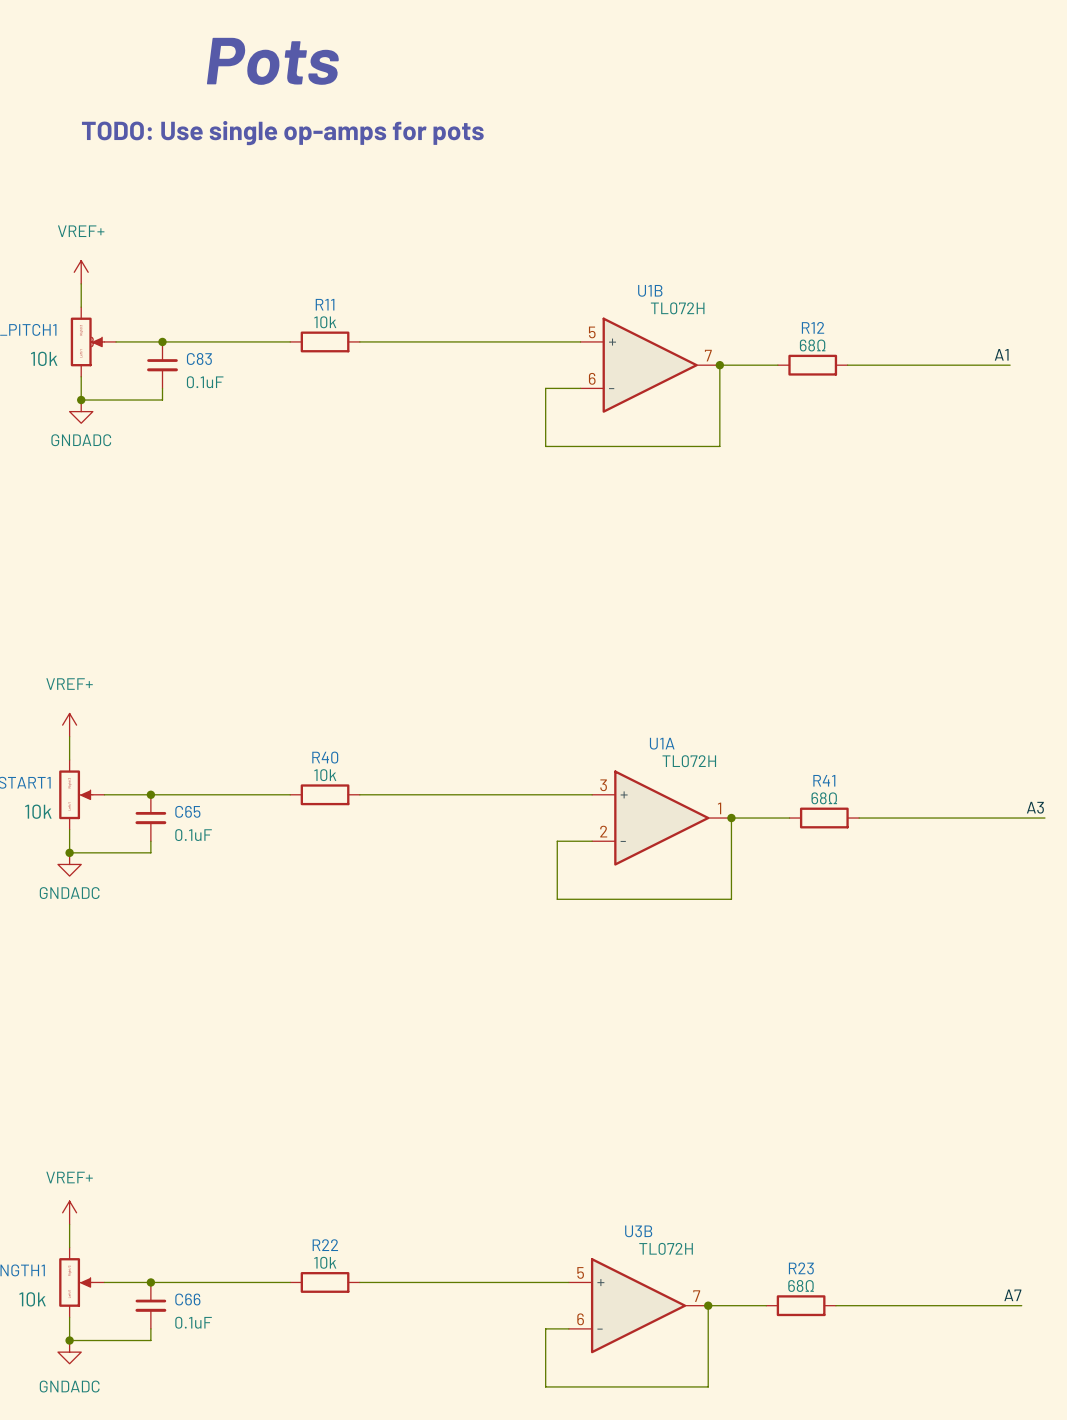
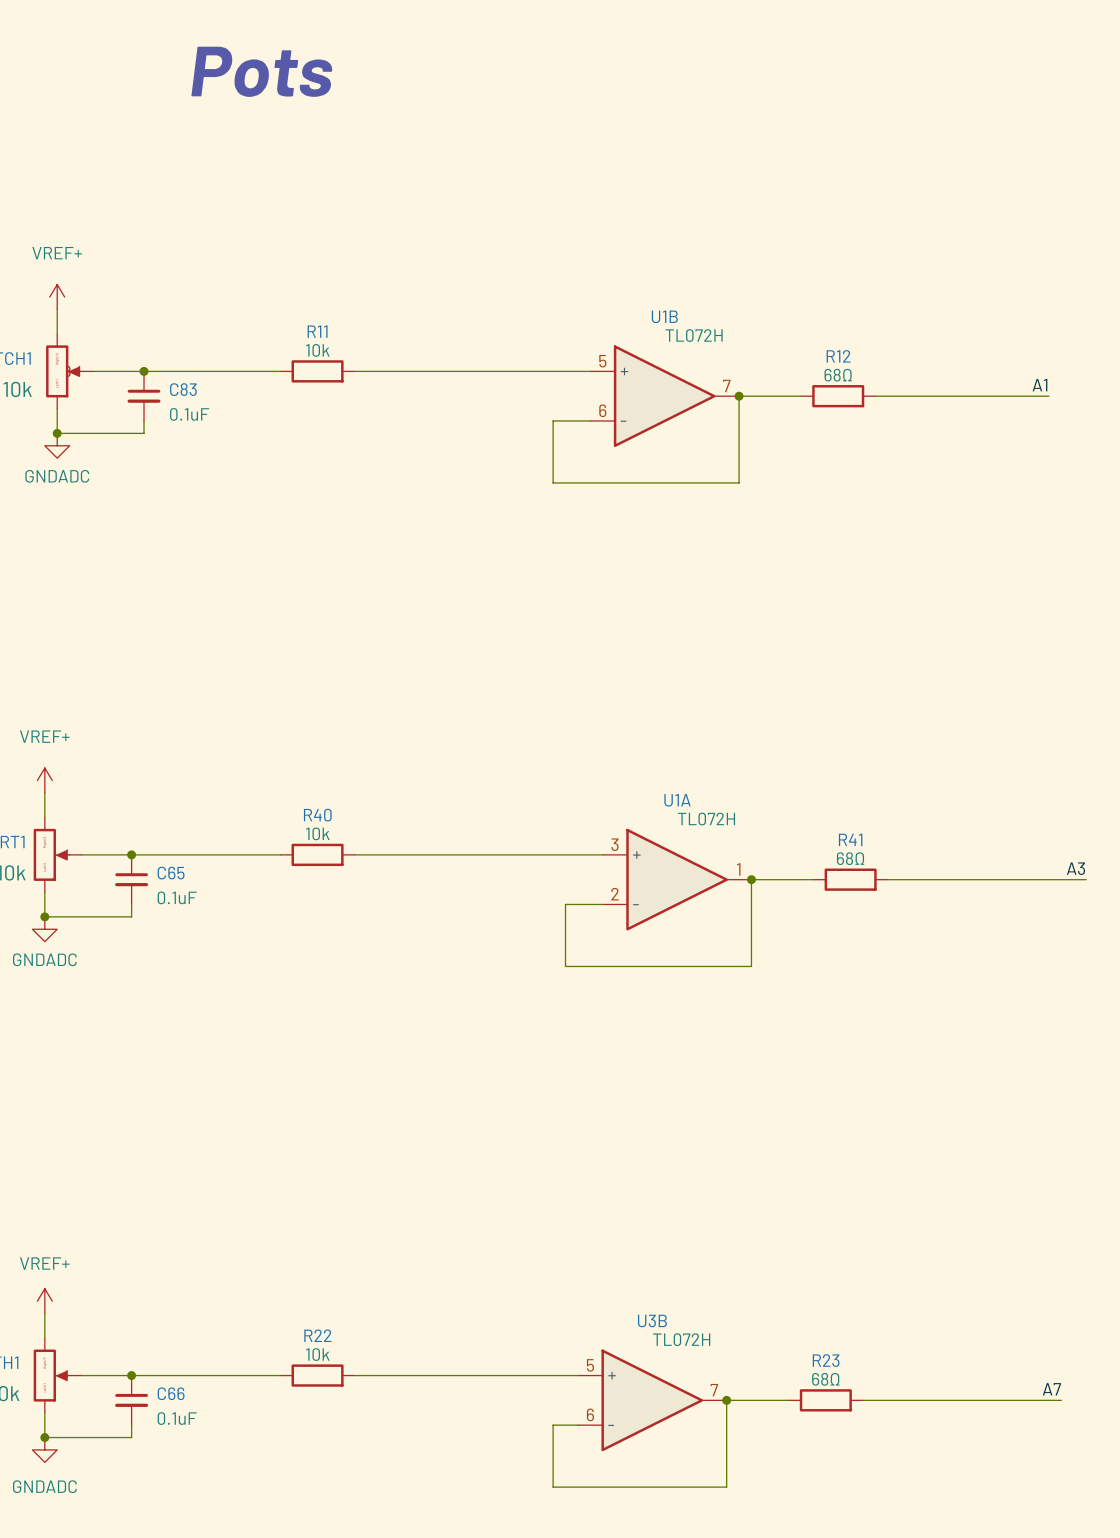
text: TODO: Use single op-amps for pots (282, 133) -> none

